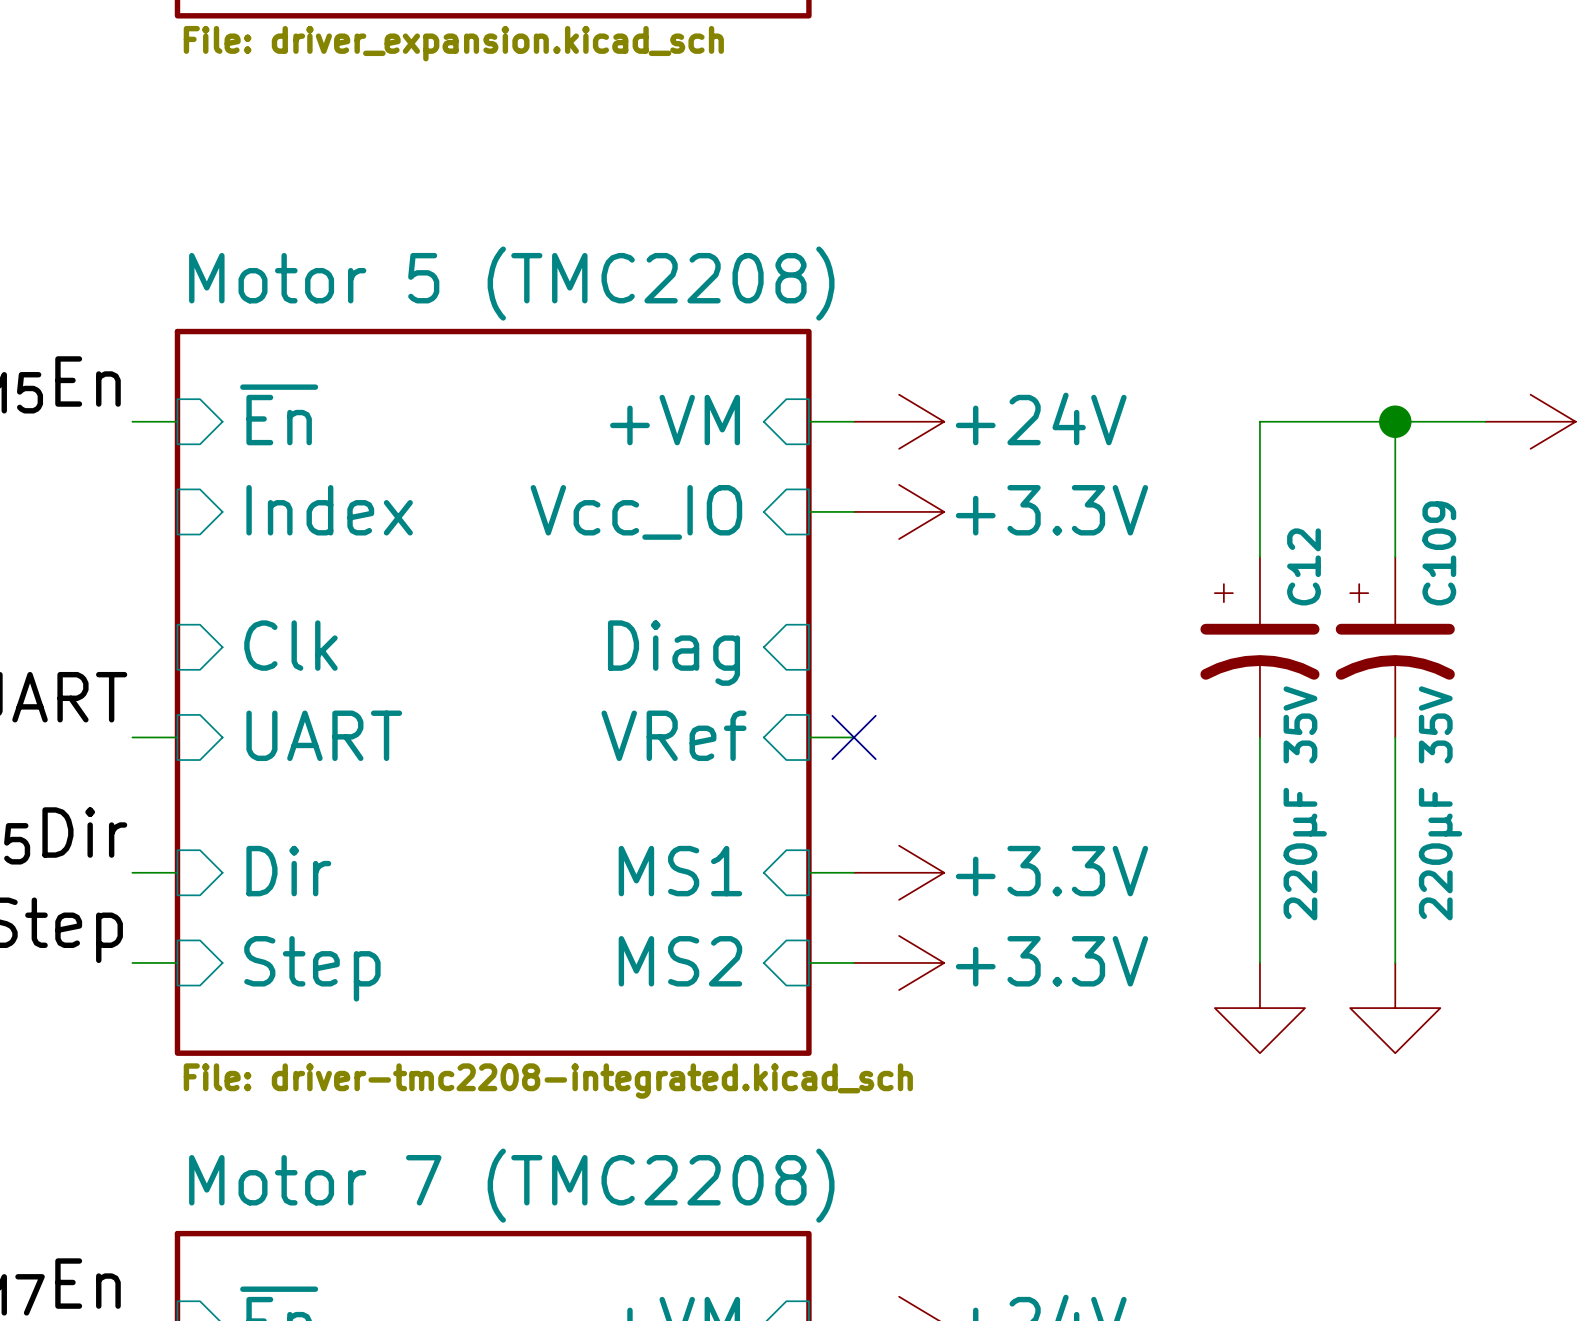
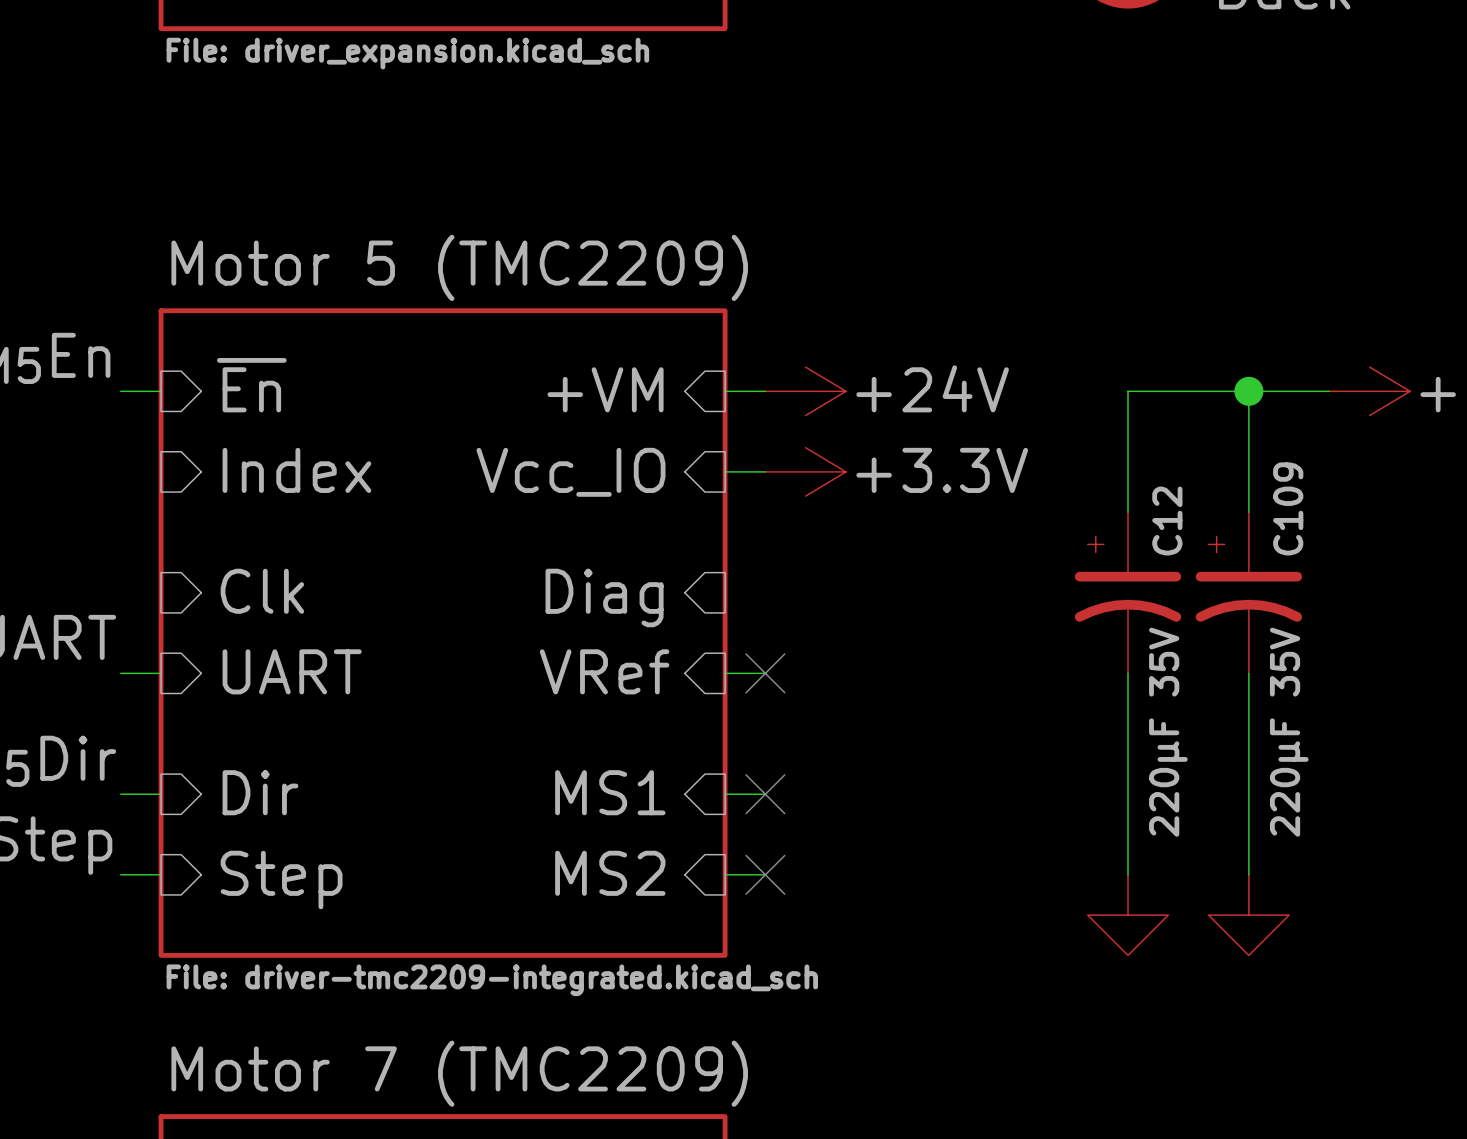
sheet Motor 5 (TMC2208) name: Motor 5 (TMC2208) (511, 283) -> Motor 5 (TMC2209) (459, 267)
no-connect mark: none -> (765, 794)
power symbol: +3.3V (899, 872) -> none
no-connect mark: none -> (765, 874)
power symbol: +3.3V (899, 962) -> none
sheet Motor 5 (TMC2208) value: File: driver-tmc2208-integrated.kicad_sch (548, 1081) -> File: driver-tmc2209-integrated.kicad_sch (492, 980)
sheet Motor 7 (TMC2208) name: Motor 7 (TMC2208) (511, 1185) -> Motor 7 (TMC2209) (459, 1073)

